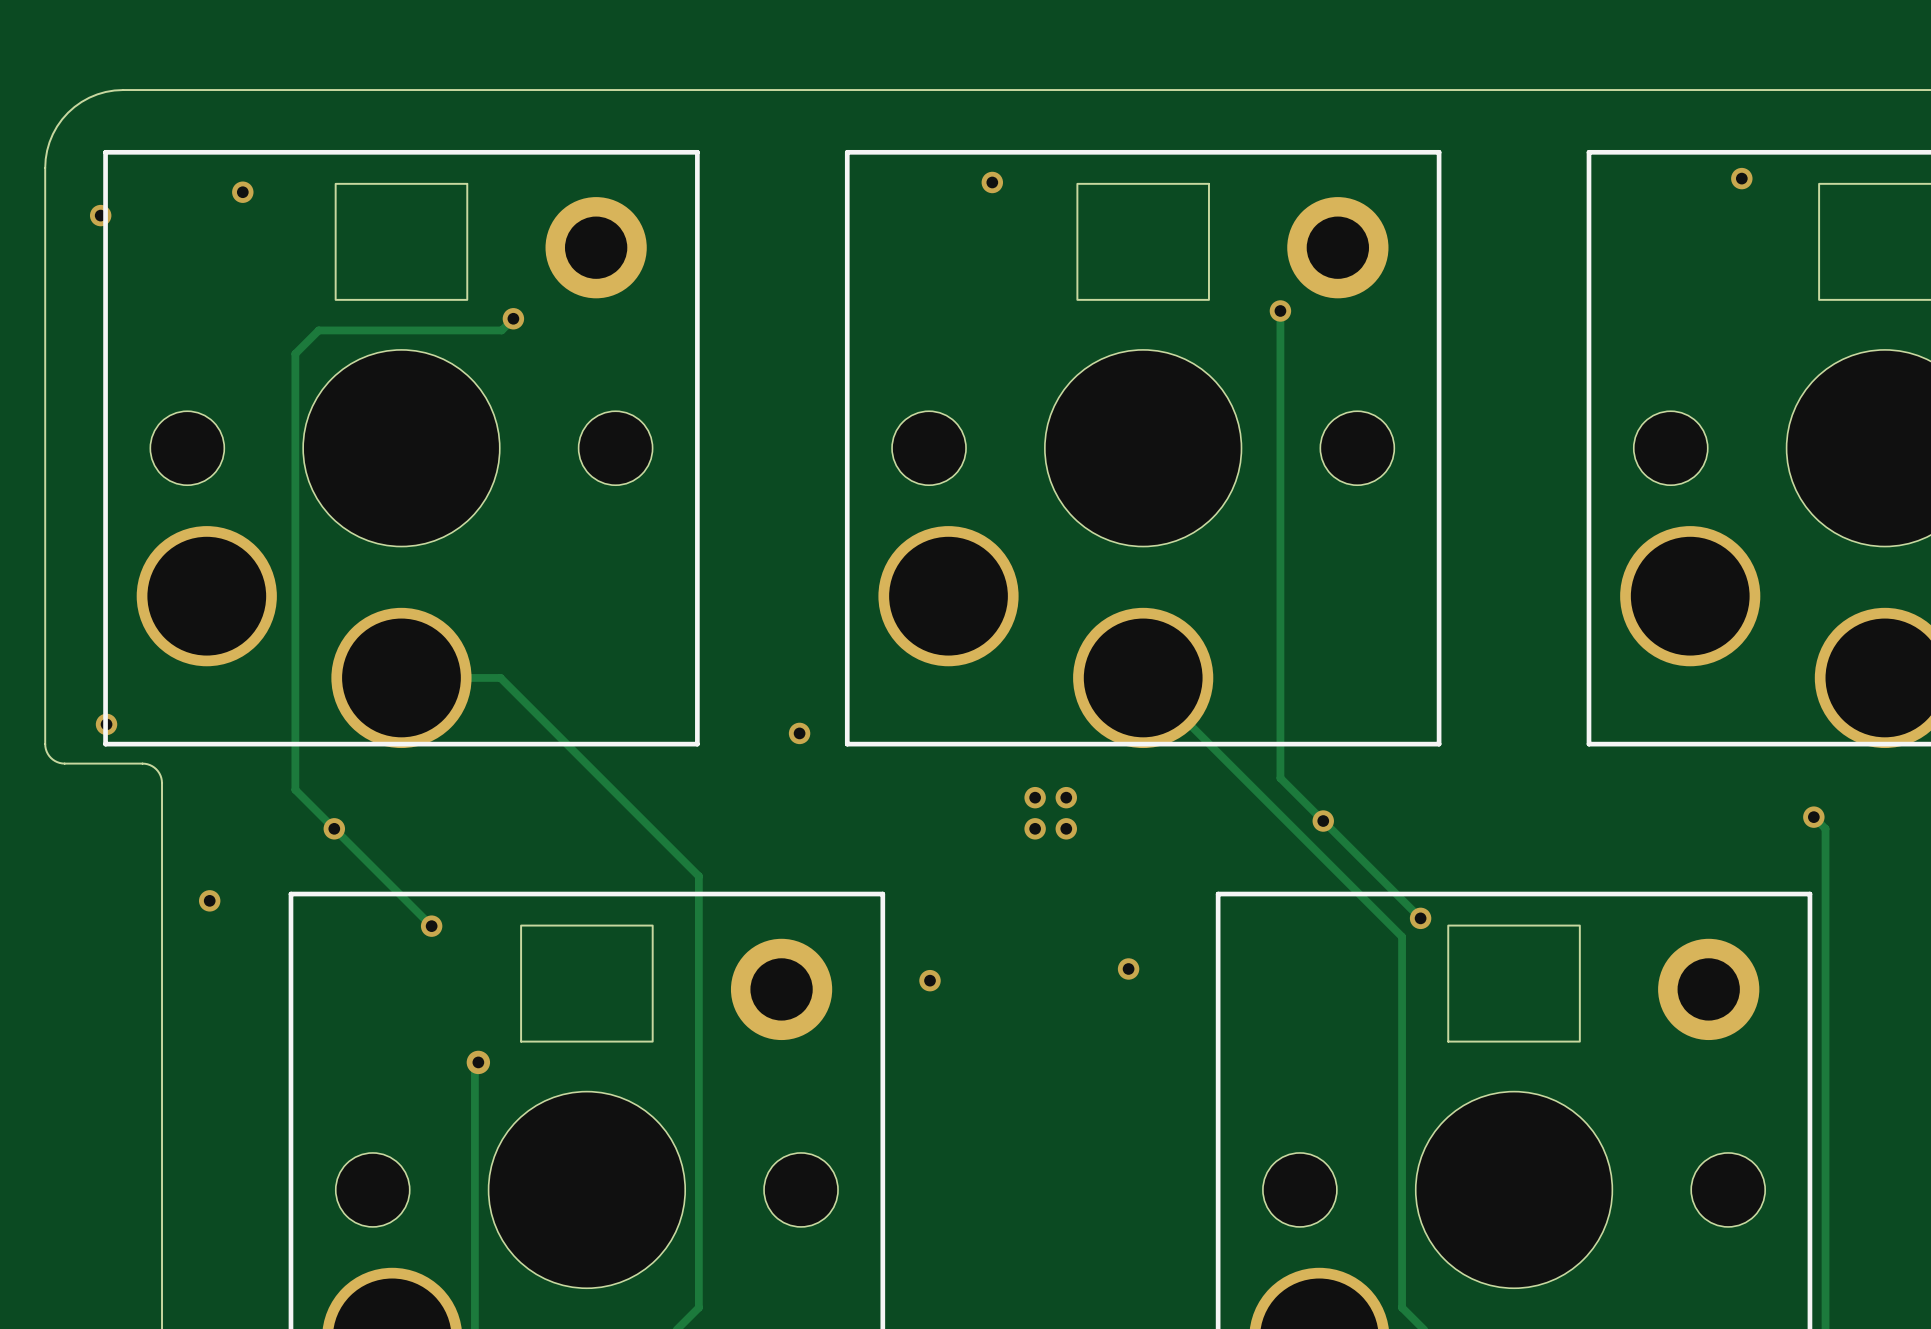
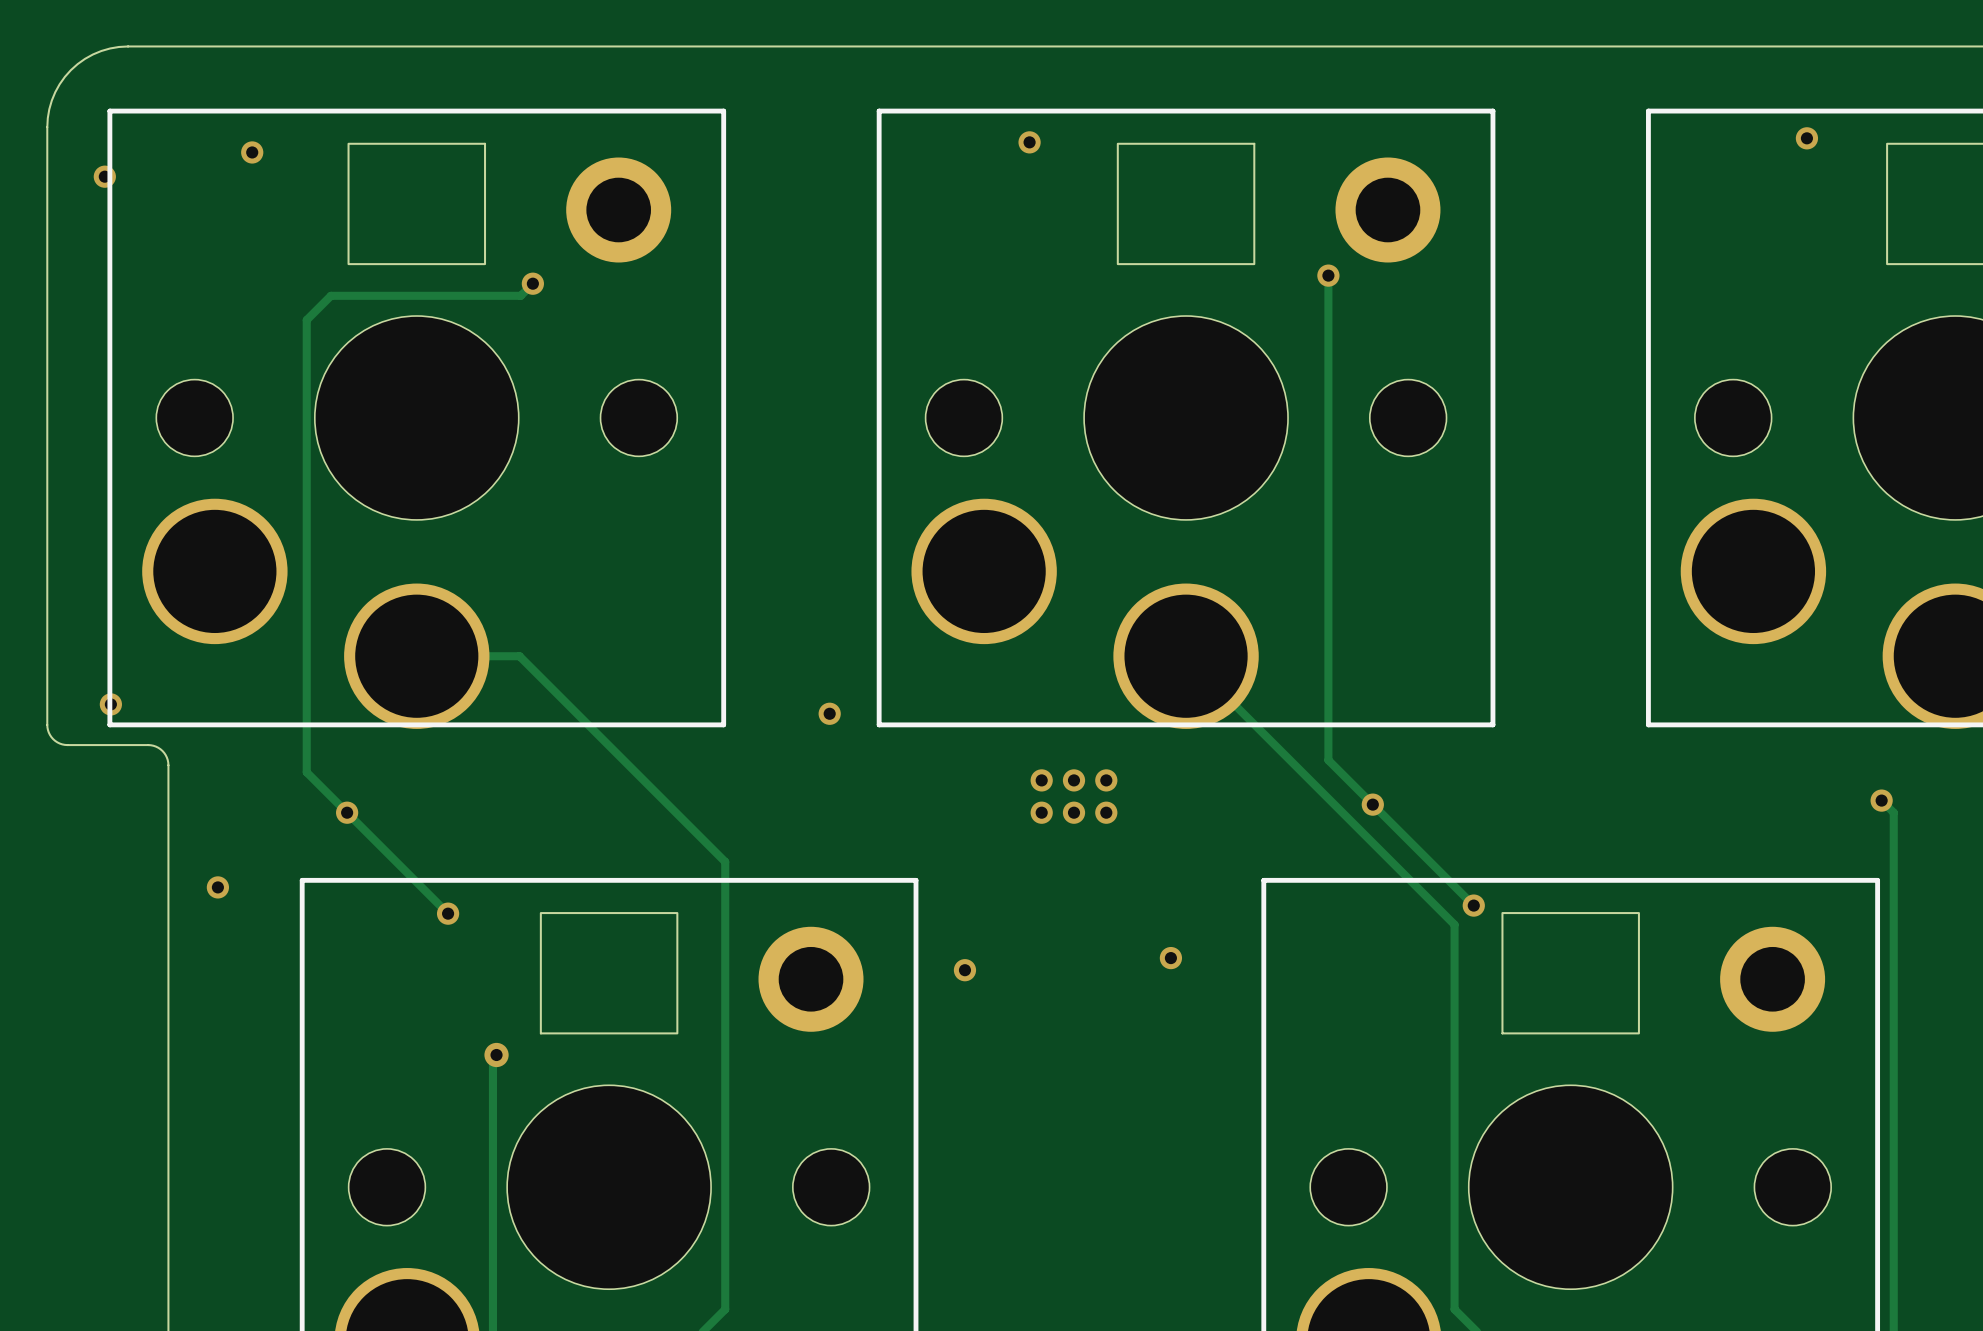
via: none -> (1041, 780)
via: none -> (1041, 812)

